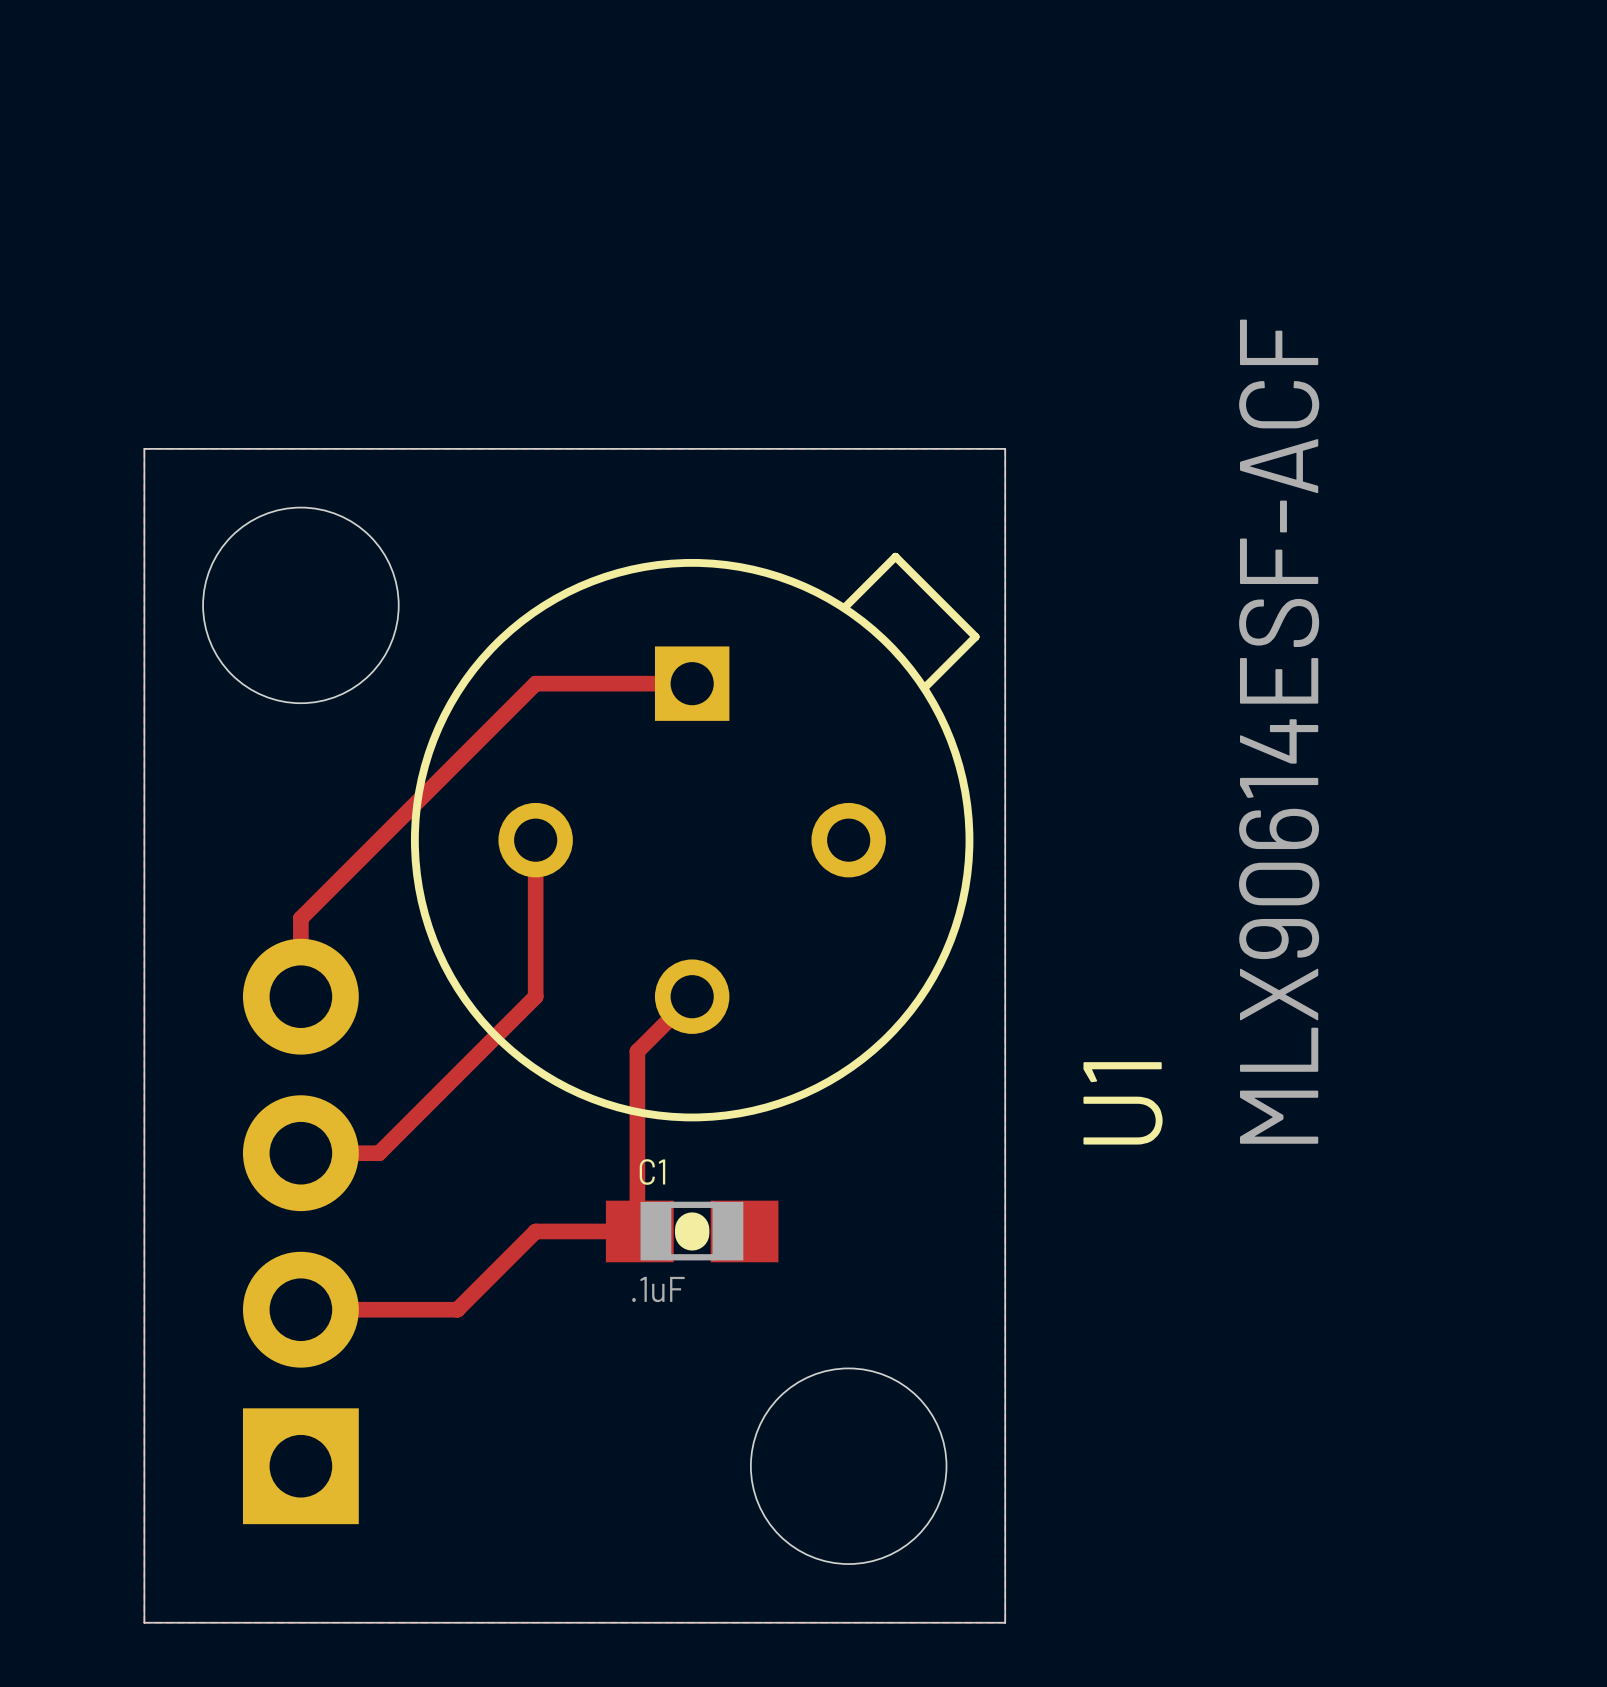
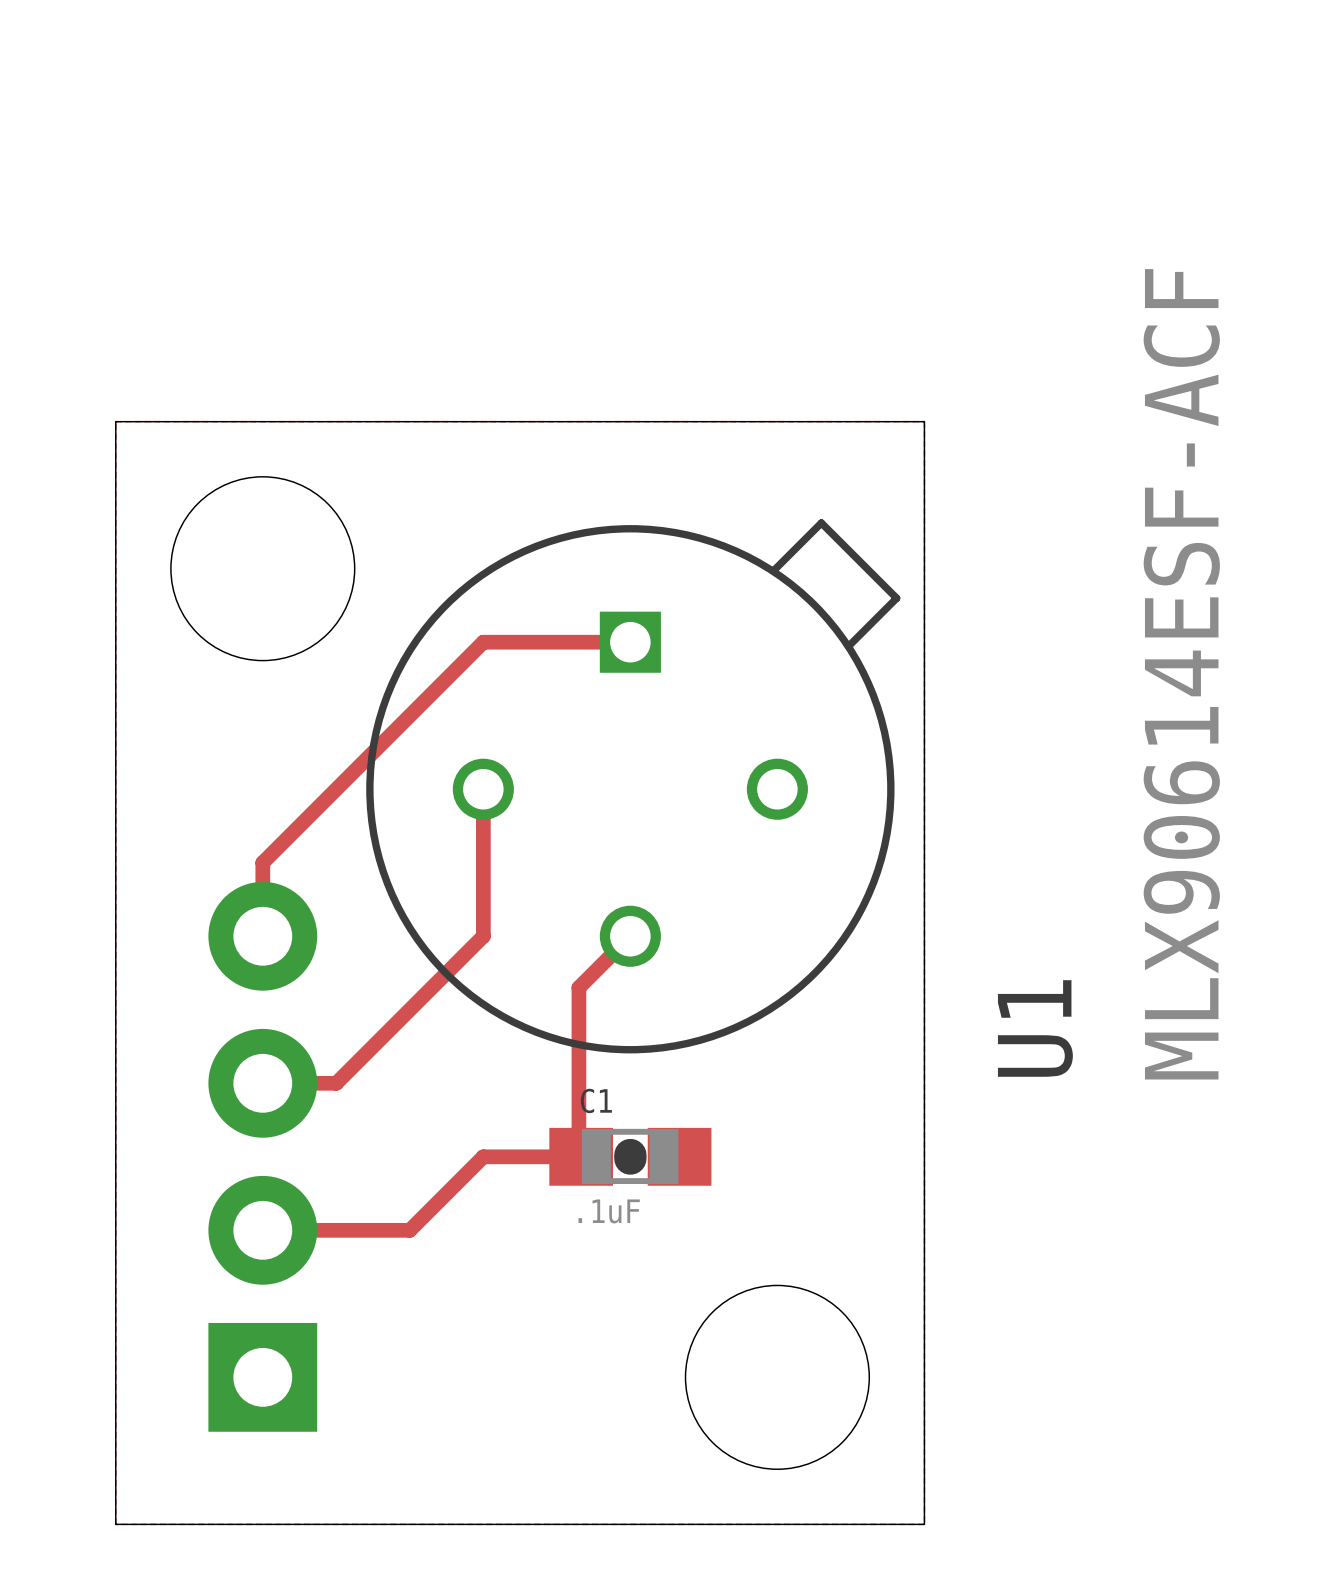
U1 footprint: [410, 552, 980, 1122] -> [366, 519, 901, 1054]

